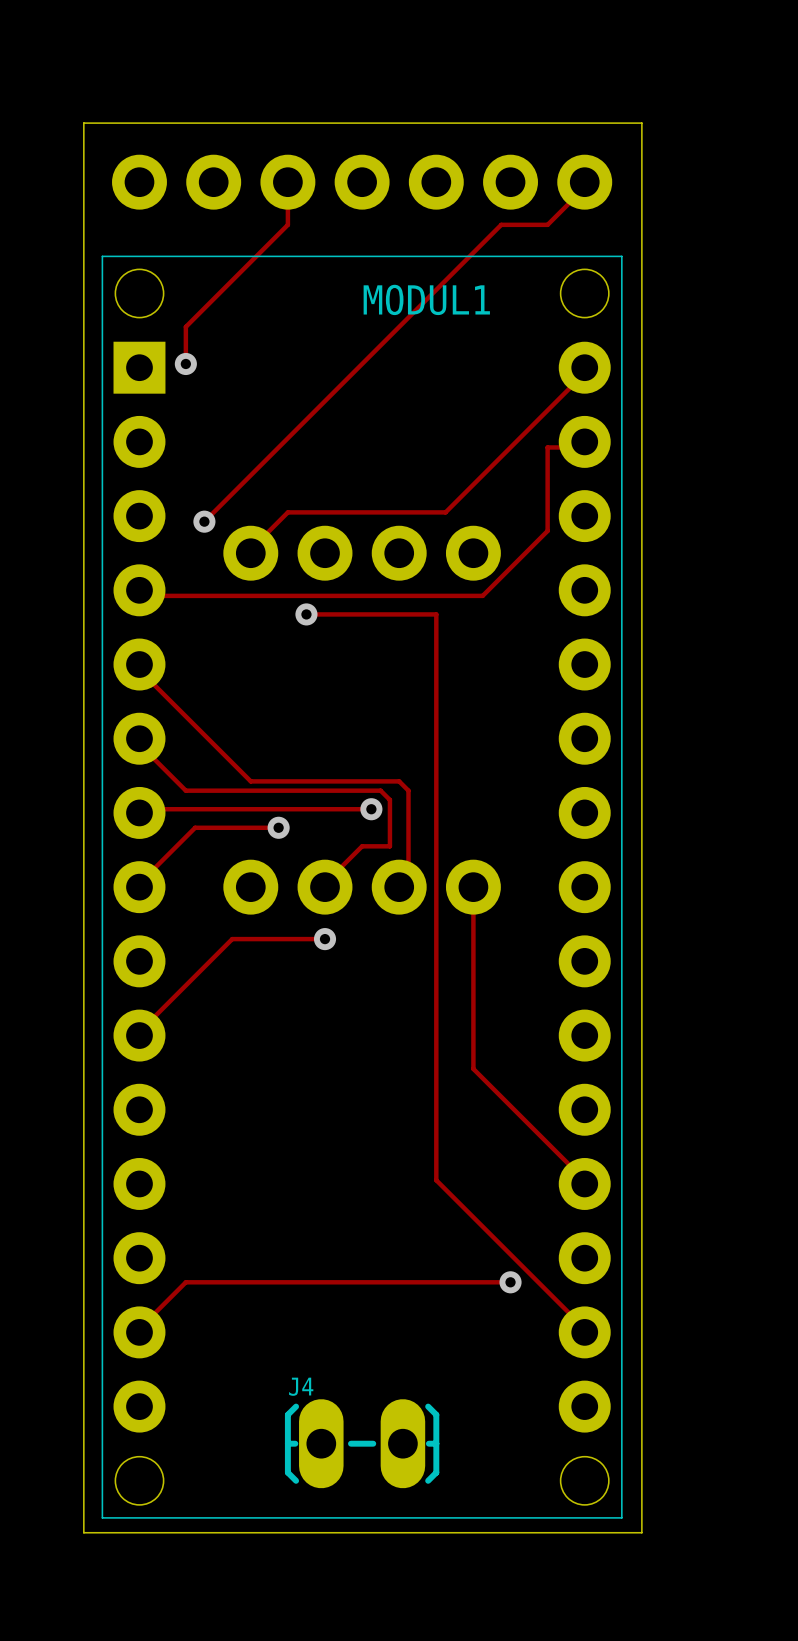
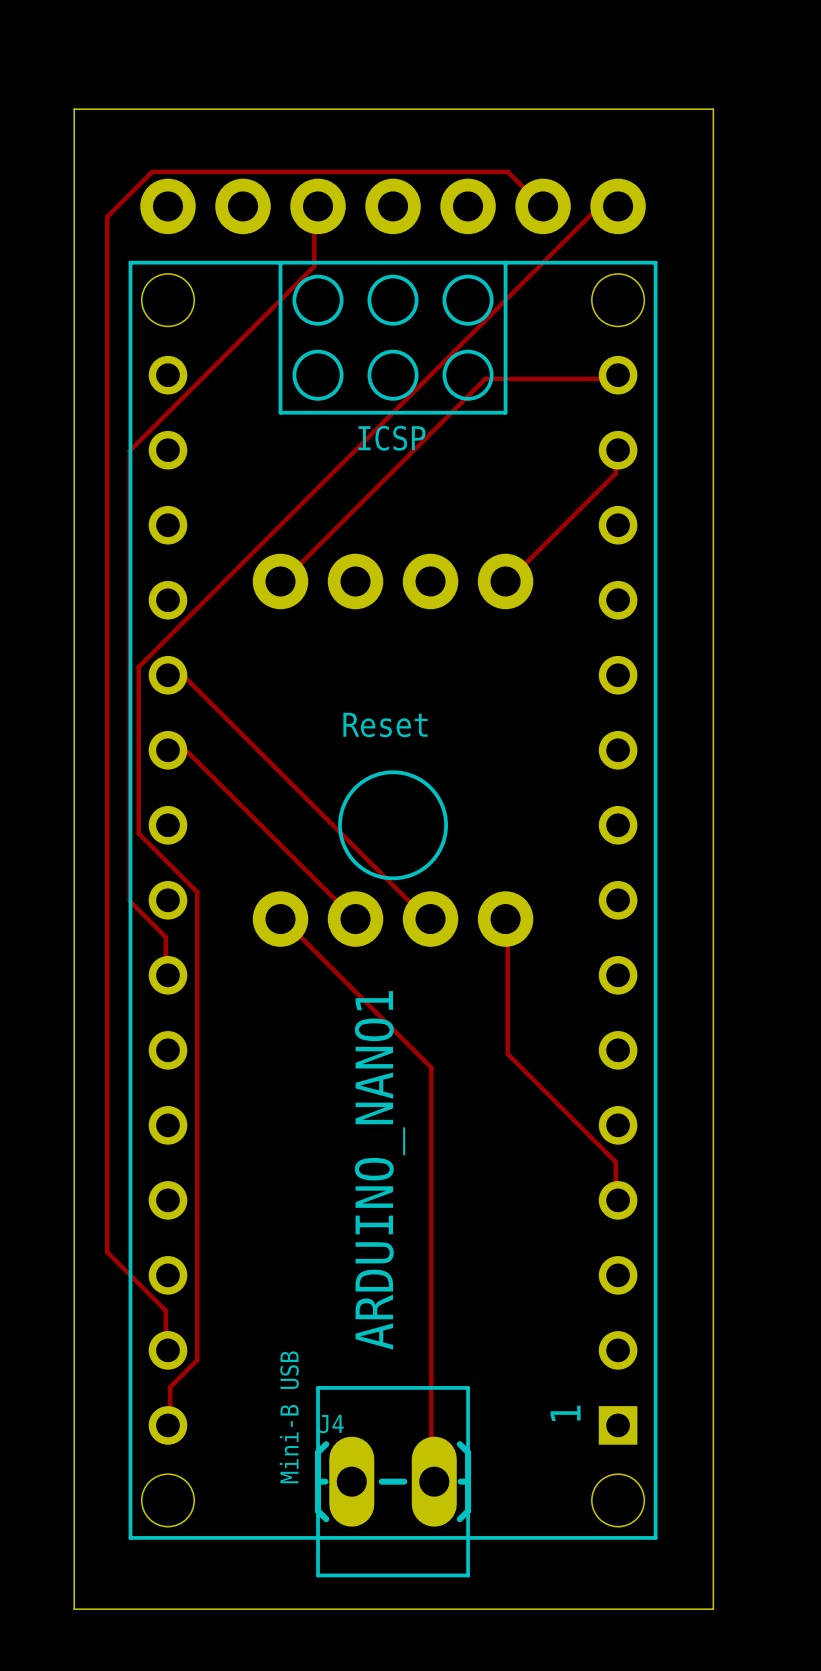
board edge: (83, 123) (641, 123) (641, 1532) (83, 1532) (83, 123) -> (74, 109) (74, 1609) (713, 1609) (713, 109) (74, 109)
track: (287, 182) (287, 224) (185, 326) (185, 363) -> (318, 206) (314, 207) (314, 266) (129, 450) (129, 901) (165, 937) (165, 973) (167, 975)
track: none -> (543, 206) (507, 171) (152, 171) (107, 216) (107, 1252) (165, 1310) (165, 1346) (167, 1350)
track: (584, 182) (584, 187) (547, 224) (501, 224) (204, 521) -> (618, 206) (597, 207) (138, 667) (138, 833) (197, 892) (197, 1360) (170, 1387) (170, 1423) (167, 1425)
via: (185, 363) -> none
track: (584, 367) (584, 373) (445, 512) (287, 512) (250, 549) (250, 553) -> (618, 375) (615, 378) (485, 378) (282, 581) (280, 581)
track: none -> (618, 450) (615, 450) (615, 473) (507, 581) (505, 581)
track: (584, 441) (584, 447) (547, 447) (547, 530) (482, 595) (139, 595) (139, 590) -> none
via: (204, 521) -> none
track: (306, 614) (436, 614) (436, 1180) (584, 1328) (584, 1332) -> none
via: (306, 614) -> none
track: (139, 664) (139, 670) (250, 781) (399, 781) (408, 790) (408, 883) (399, 883) (399, 887) -> (167, 675) (183, 676) (426, 919) (430, 919)
track: (139, 738) (139, 744) (185, 790) (380, 790) (389, 799) (389, 846) (362, 846) (325, 883) (325, 887) -> (167, 750) (170, 752) (188, 752) (355, 919)
track: (371, 809) (139, 809) (139, 812) -> none
via: (371, 809) -> none
track: (278, 827) (195, 827) (139, 883) (139, 887) -> none
via: (278, 827) -> none
track: none -> (280, 919) (282, 919) (431, 1067) (431, 1481) (434, 1481)
MODUL1: (362, 887) -> none
ARDUINO_NANO1: none -> (393, 919)
track: (473, 887) (473, 1068) (584, 1180) (584, 1183) -> (505, 919) (507, 919) (507, 1054) (615, 1162) (615, 1198) (618, 1200)
track: (325, 939) (232, 939) (139, 1031) (139, 1035) -> none
via: (325, 939) -> none
track: (510, 1282) (185, 1282) (139, 1328) (139, 1332) -> none
via: (510, 1282) -> none

